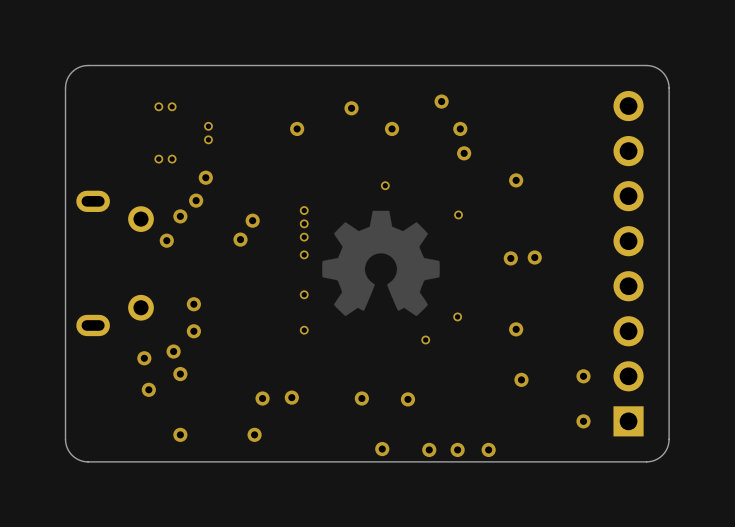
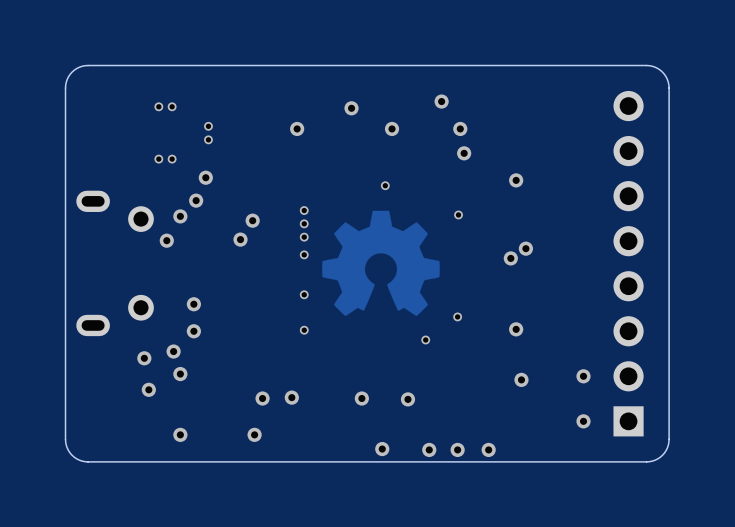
via position: (534, 257) -> (525, 248)

